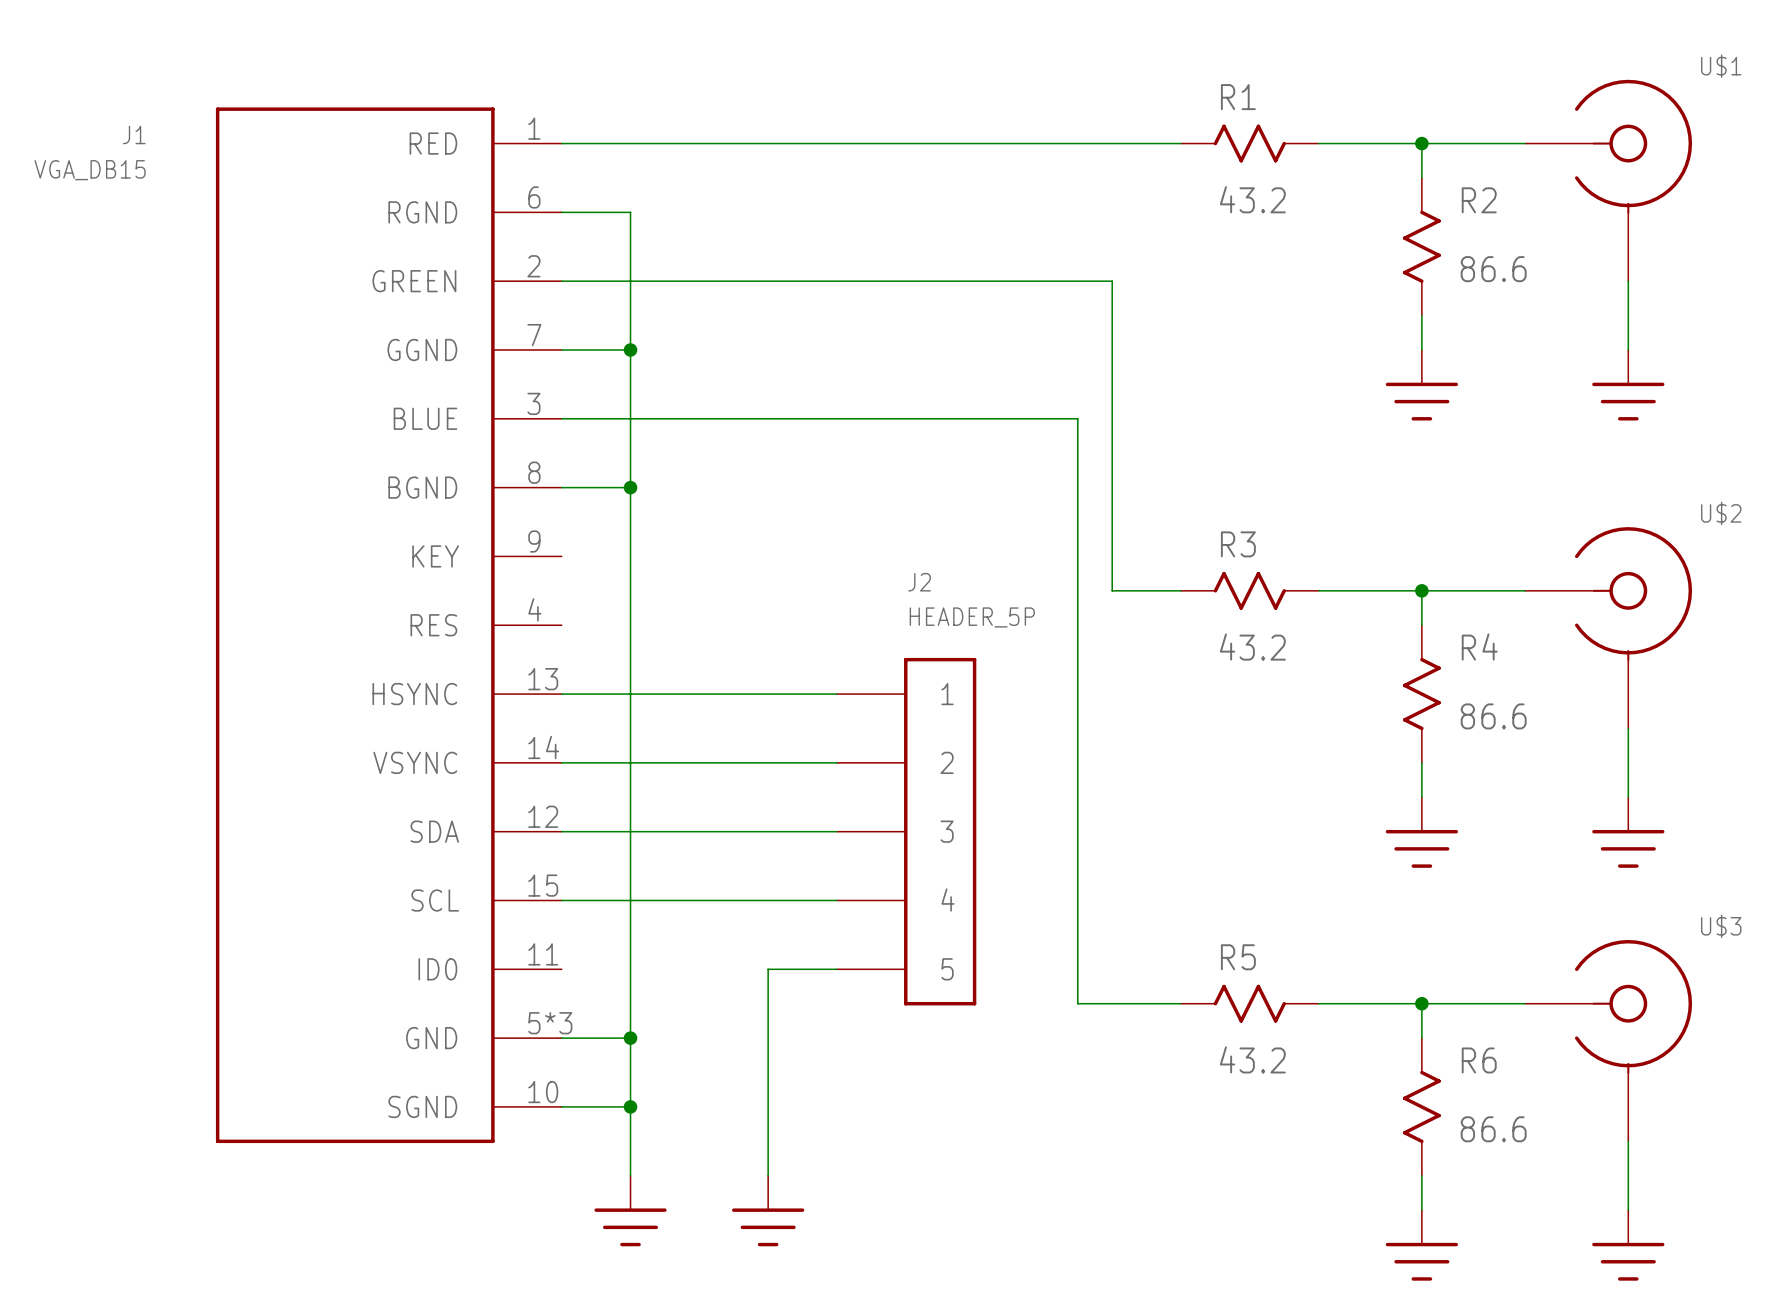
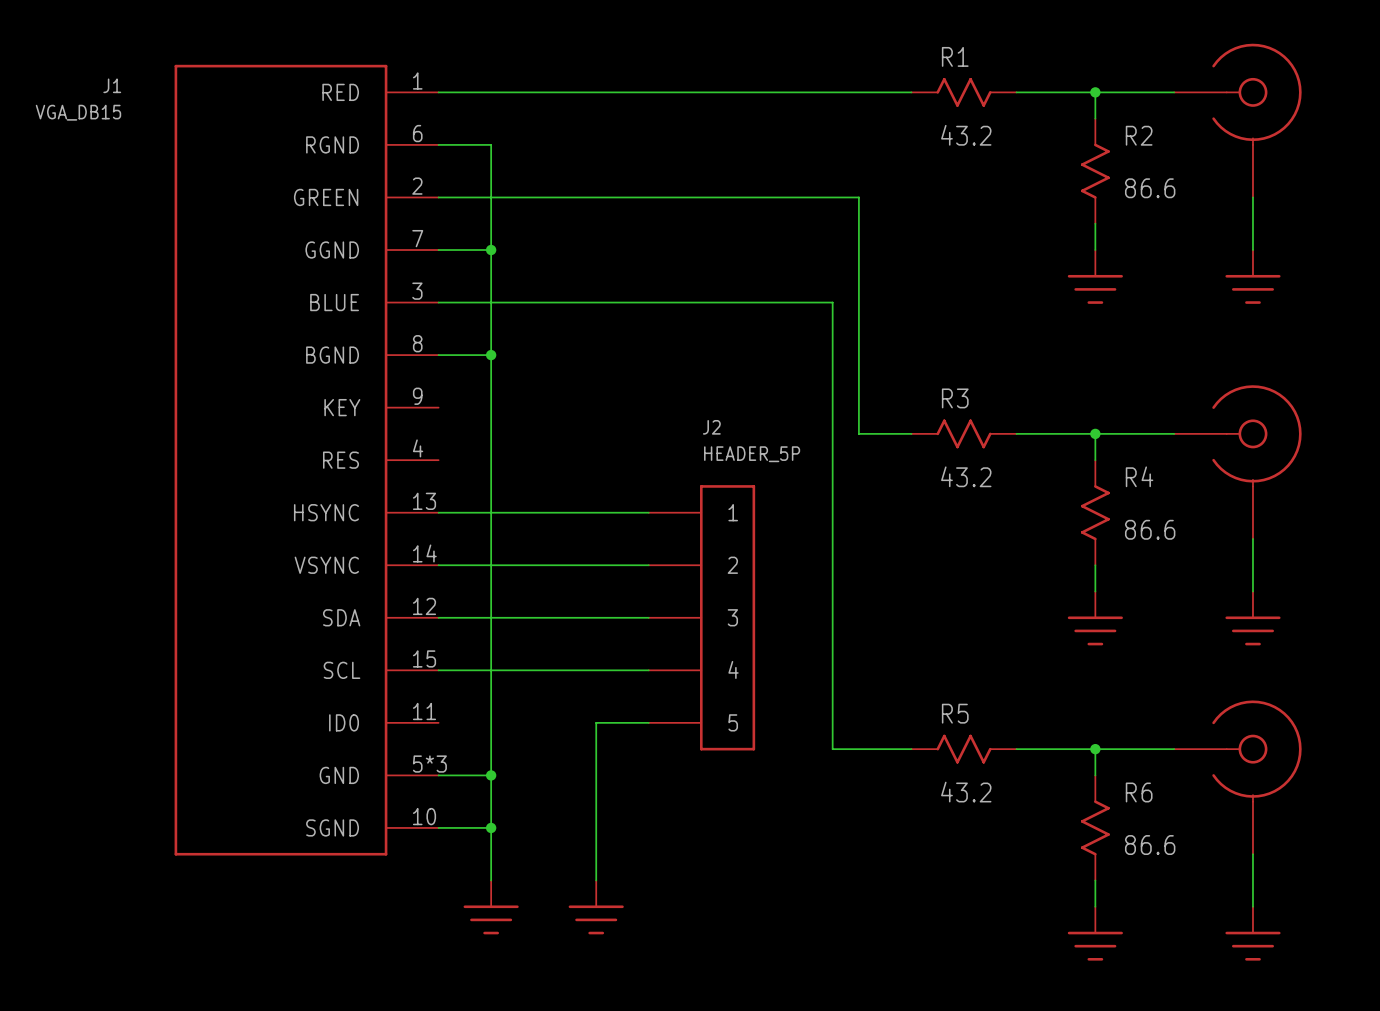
U$1 name: U$1 (1721, 66) -> none
U$2 name: U$2 (1721, 513) -> none
U$3 name: U$3 (1721, 926) -> none

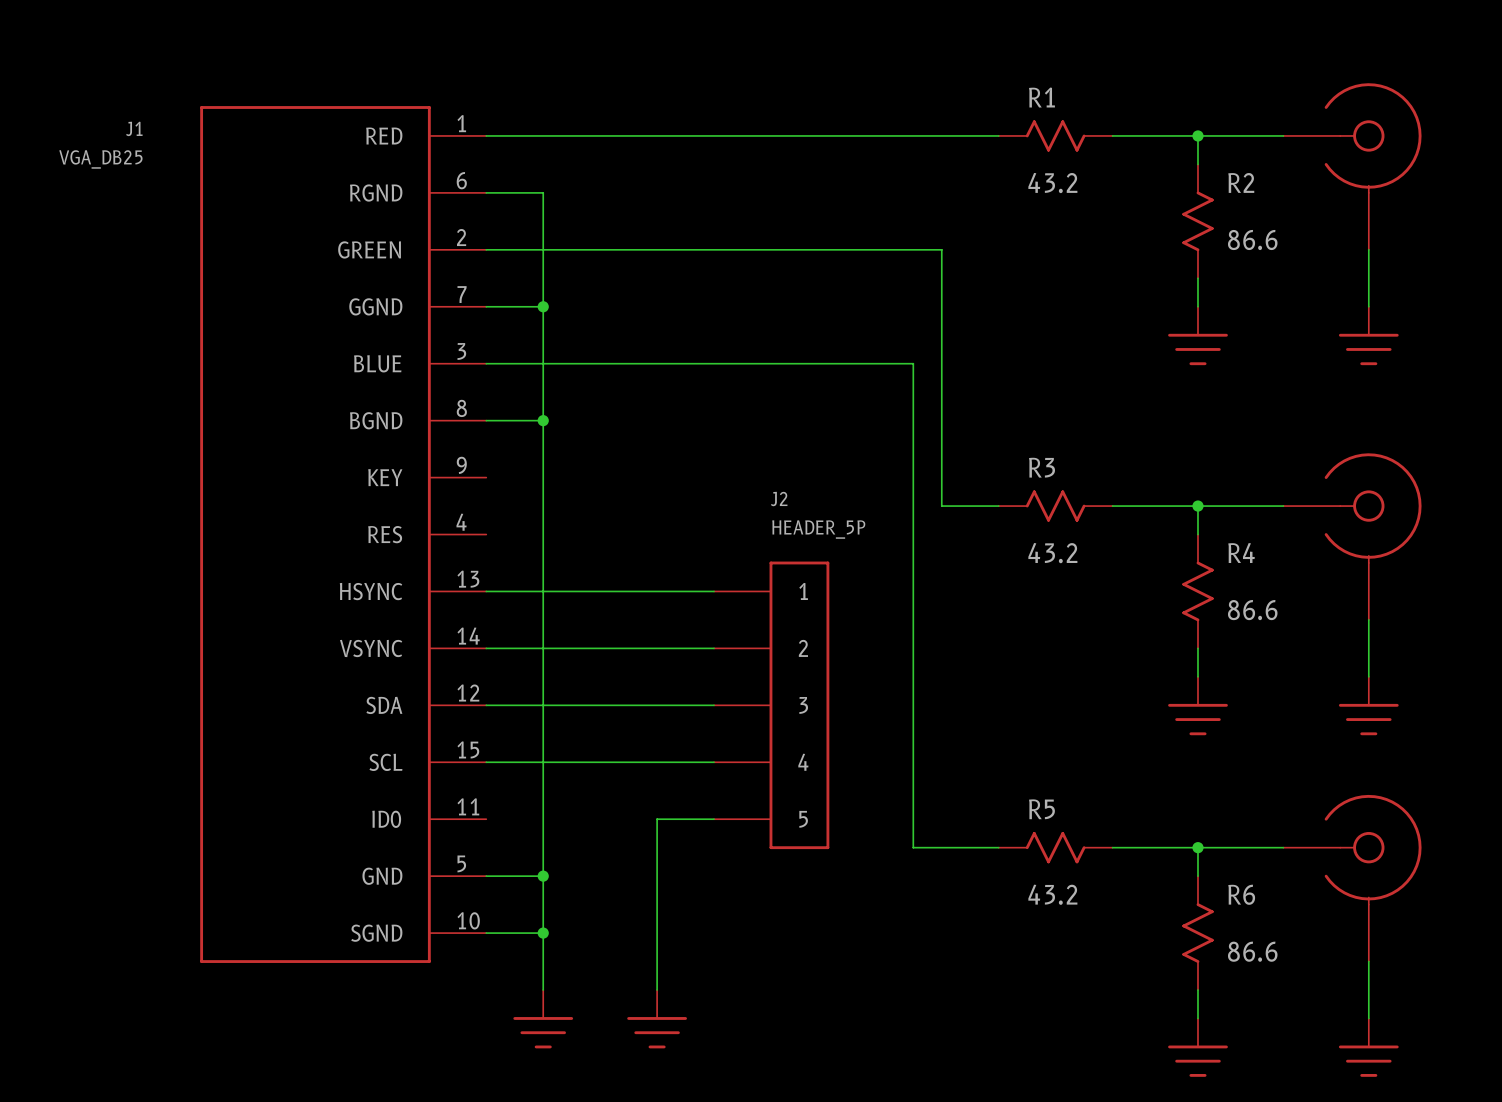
J1 value: VGA_DB15 (78, 112) -> VGA_DB25 (100, 159)
J1 pin number: 5*3 (429, 764) -> 5 (461, 863)

